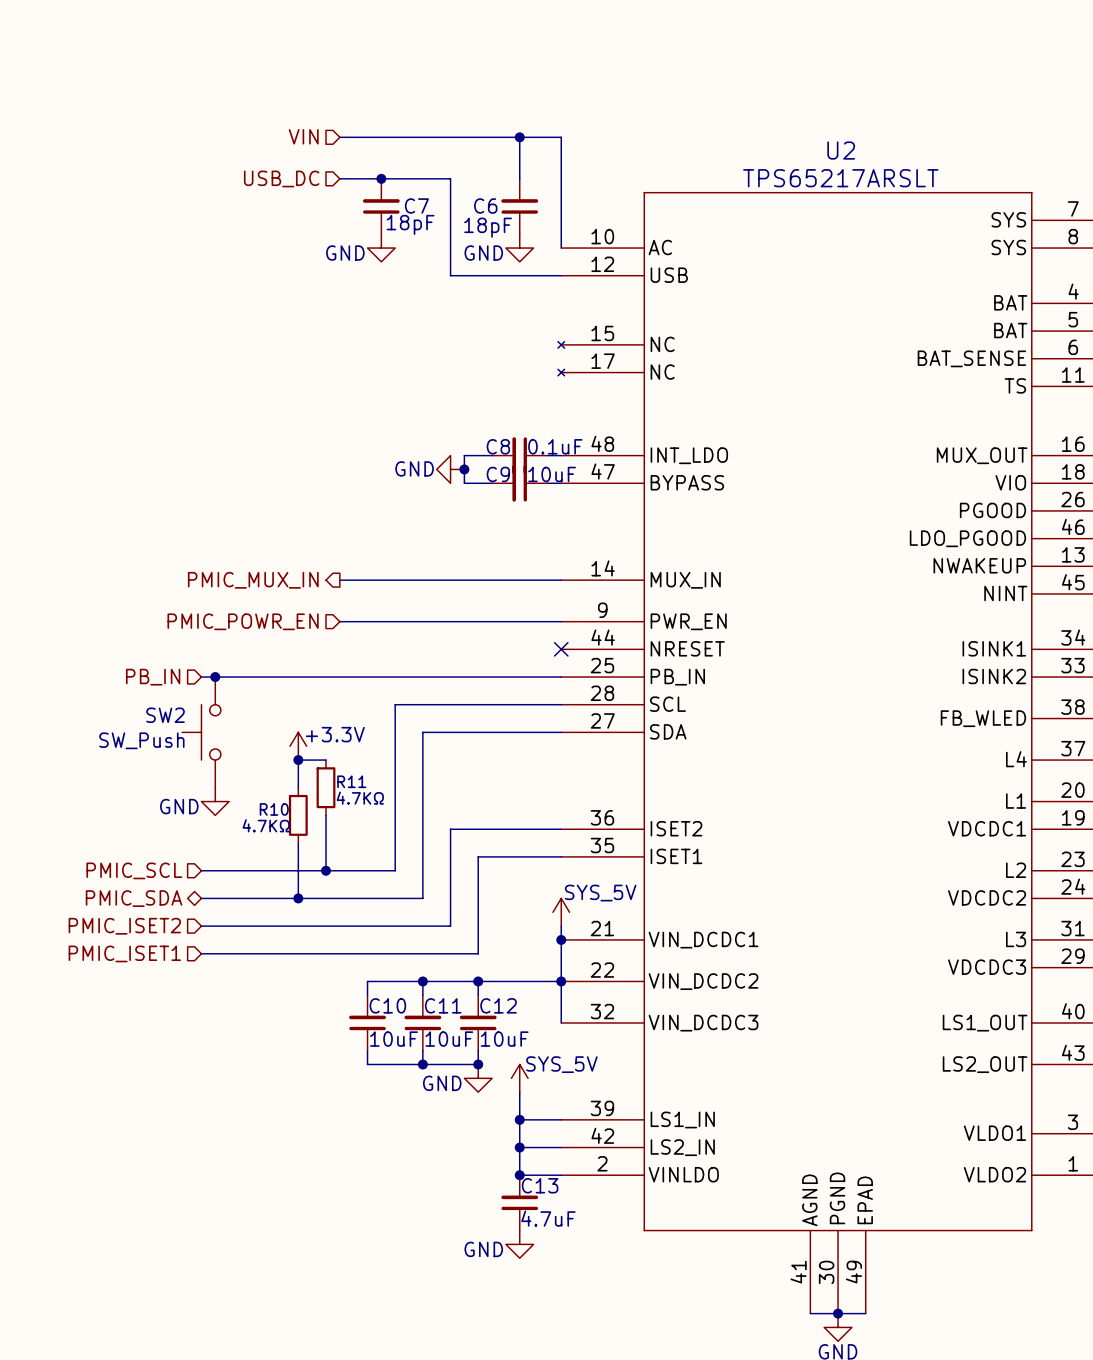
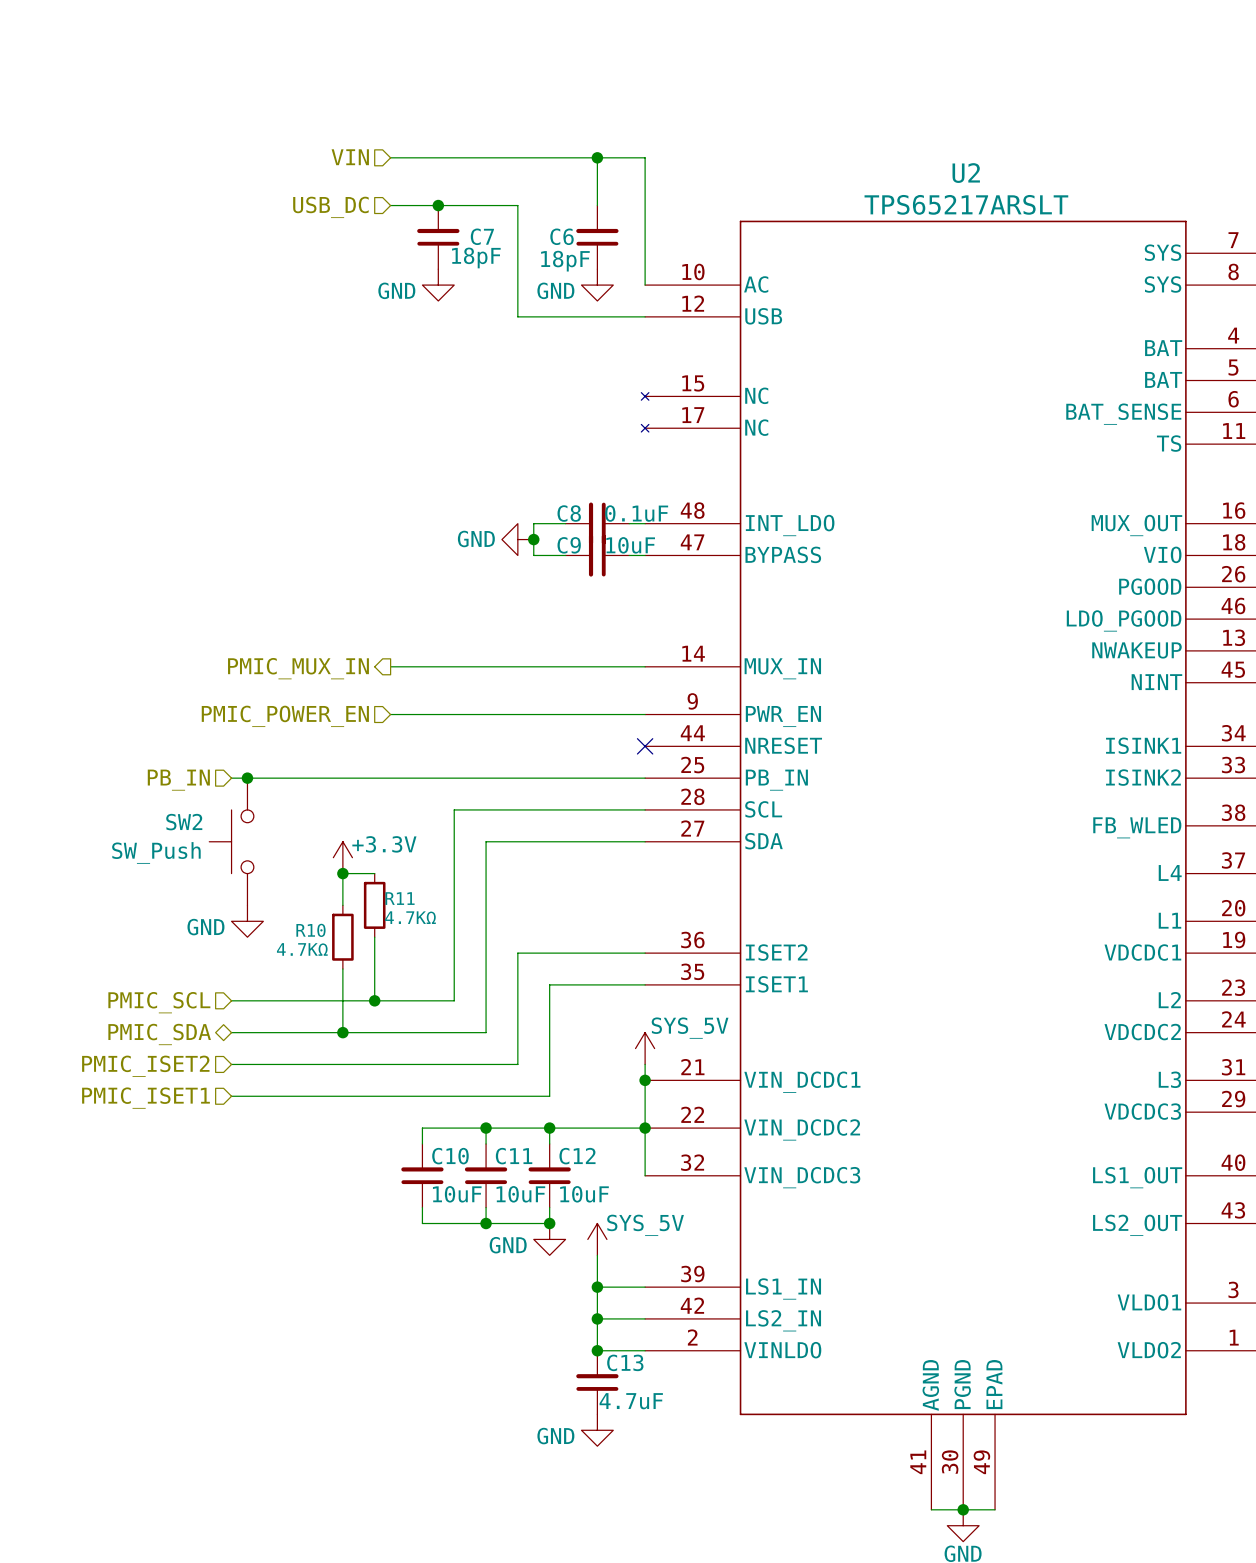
hierarchical label: PMIC_POWR_EN (243, 621) -> PMIC_POWER_EN (285, 716)

